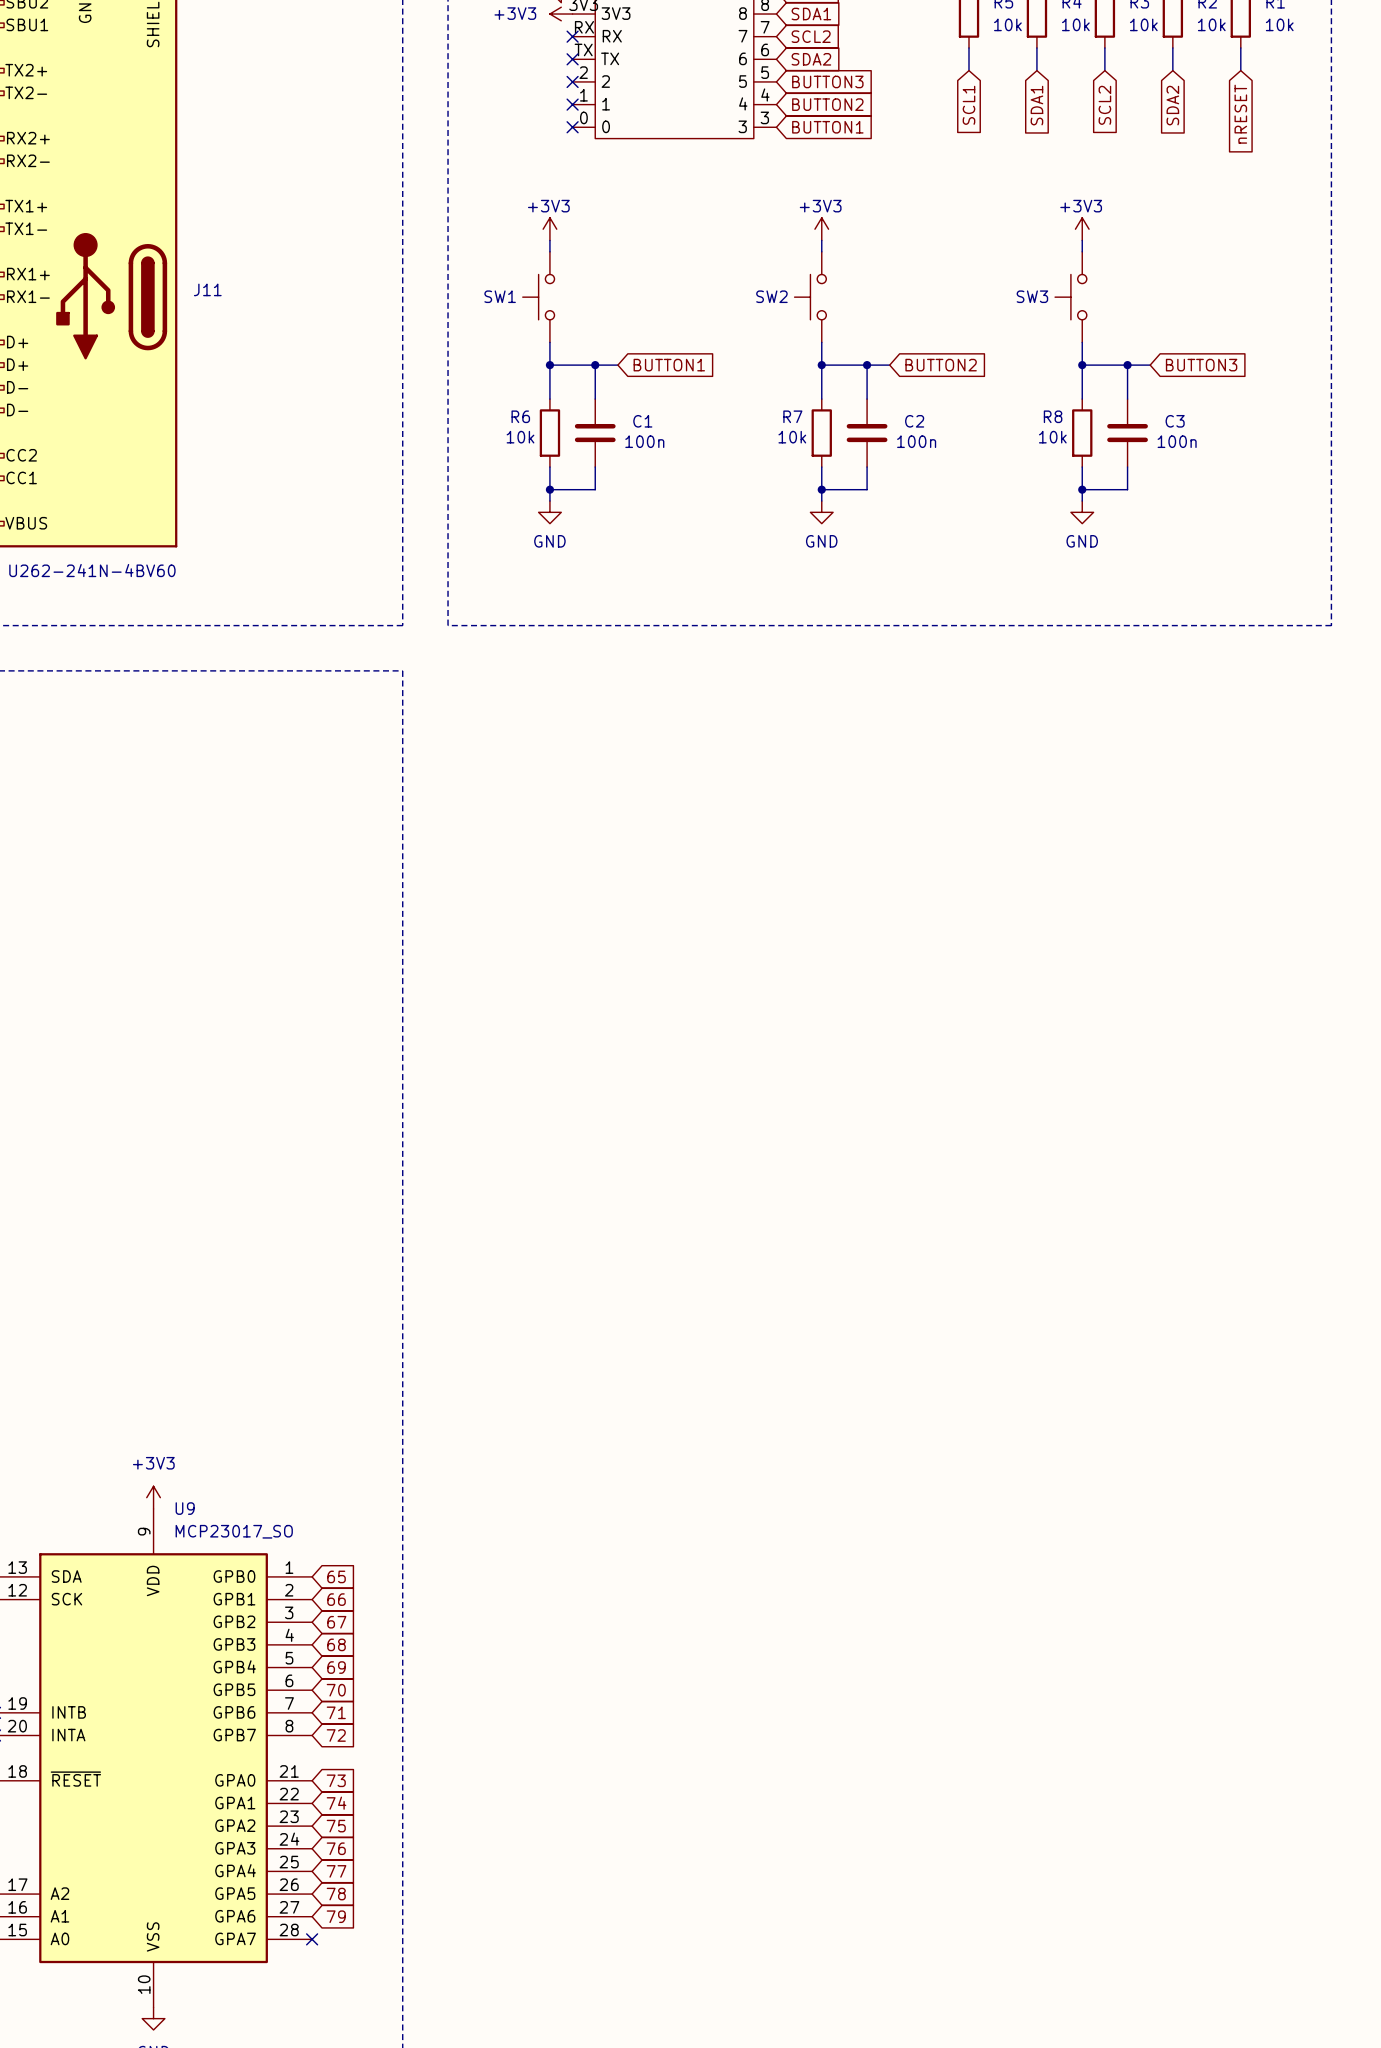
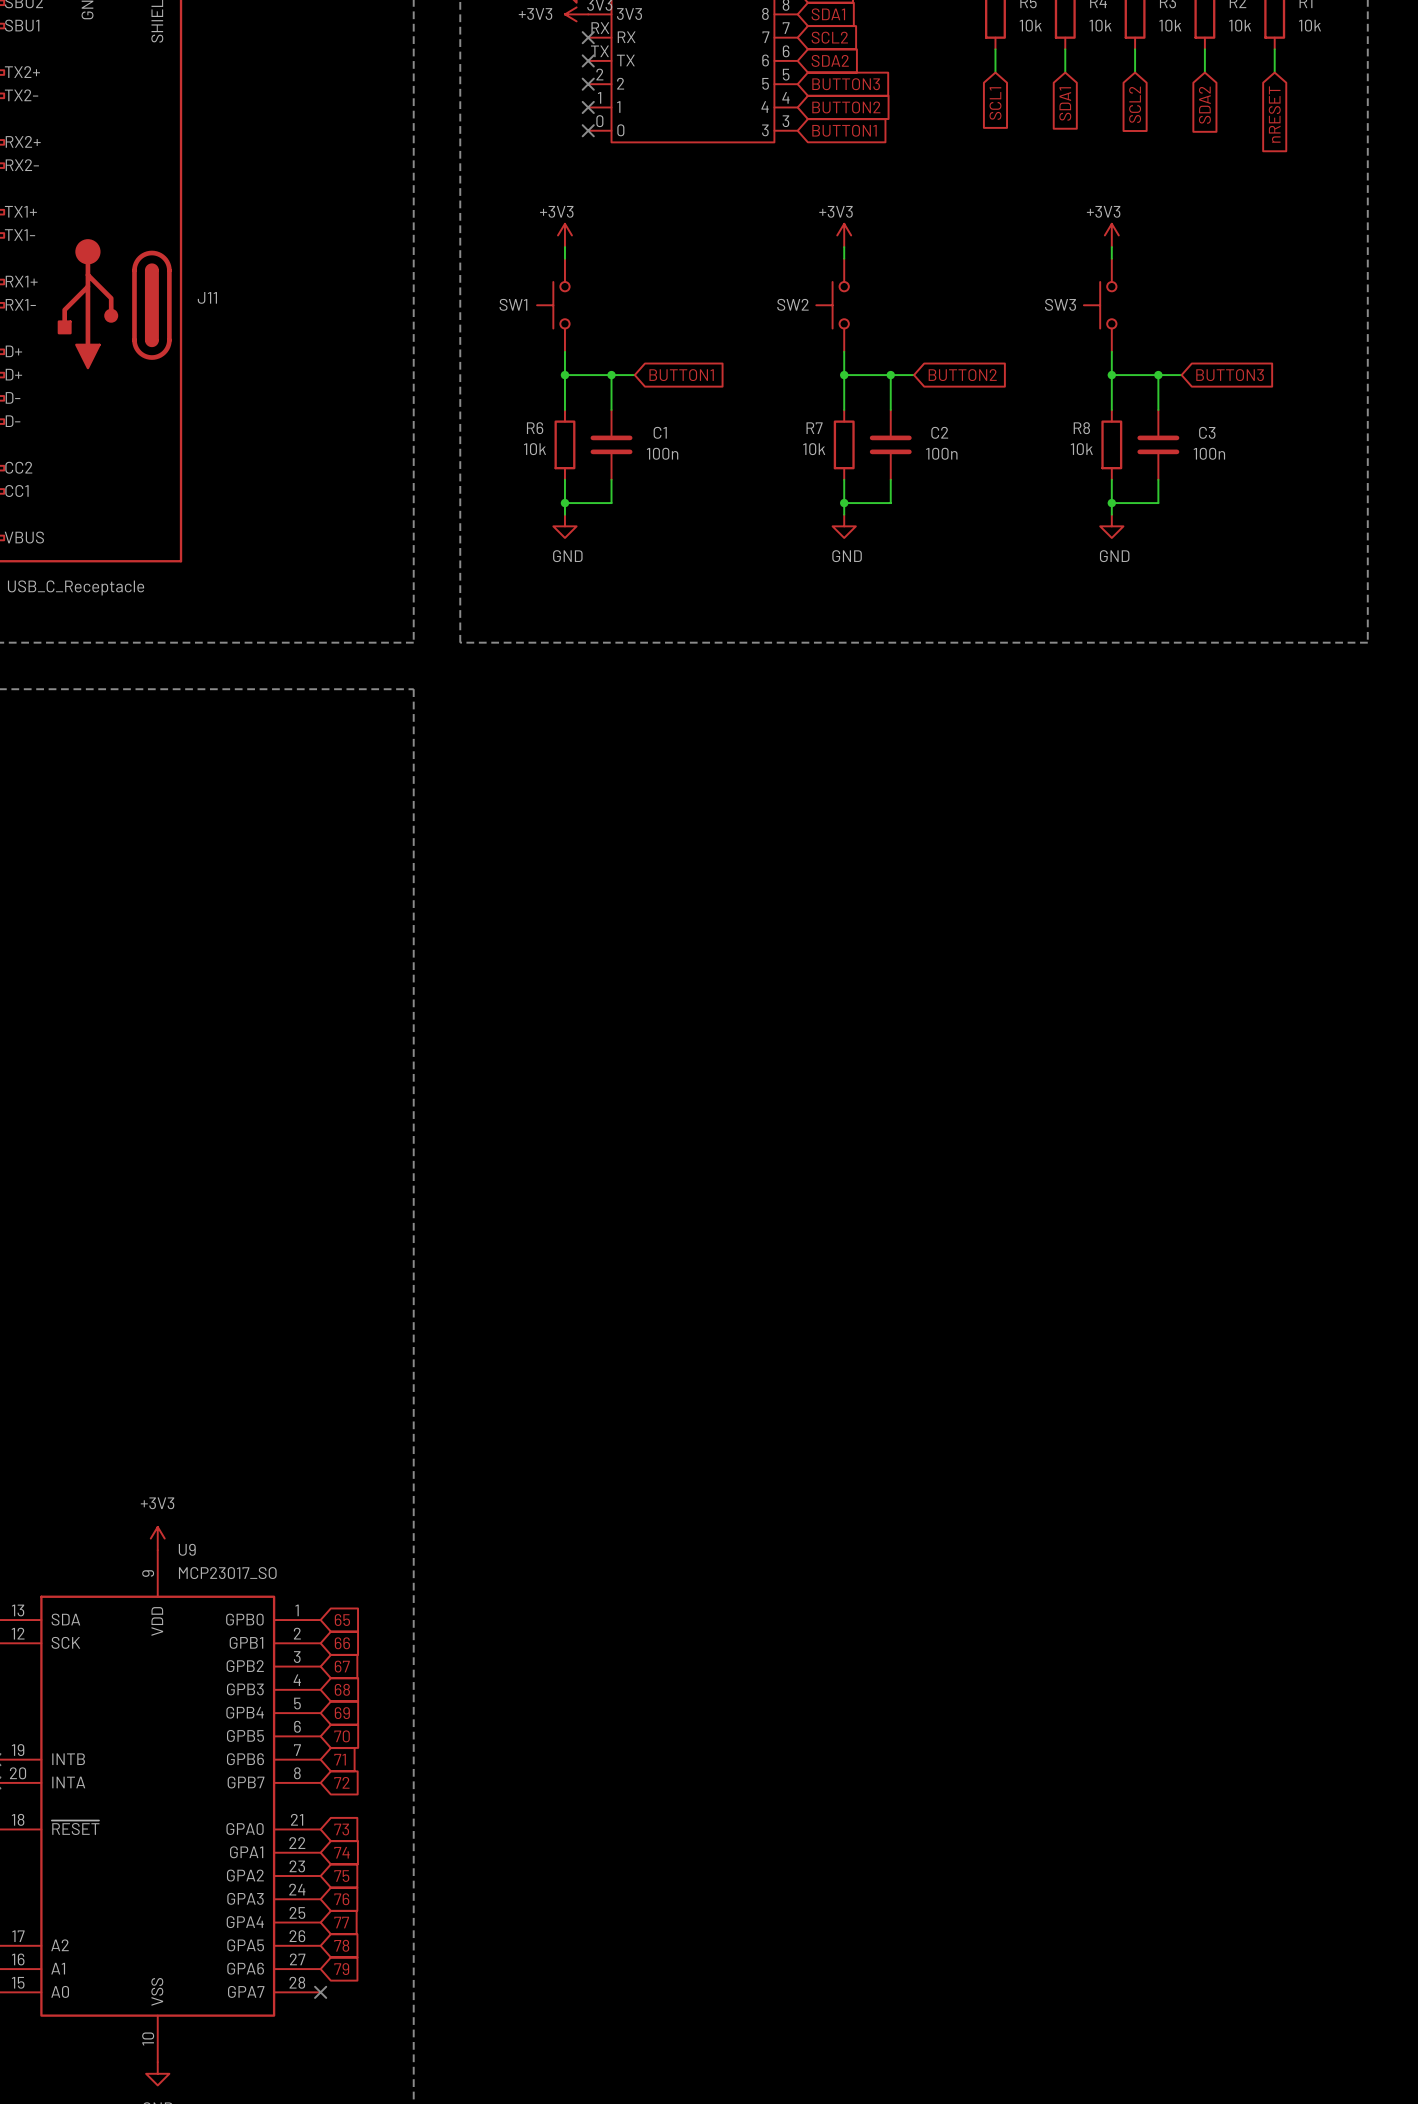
J11 value: U262-241N-4BV60 (92, 570) -> USB_C_Receptacle (76, 587)

